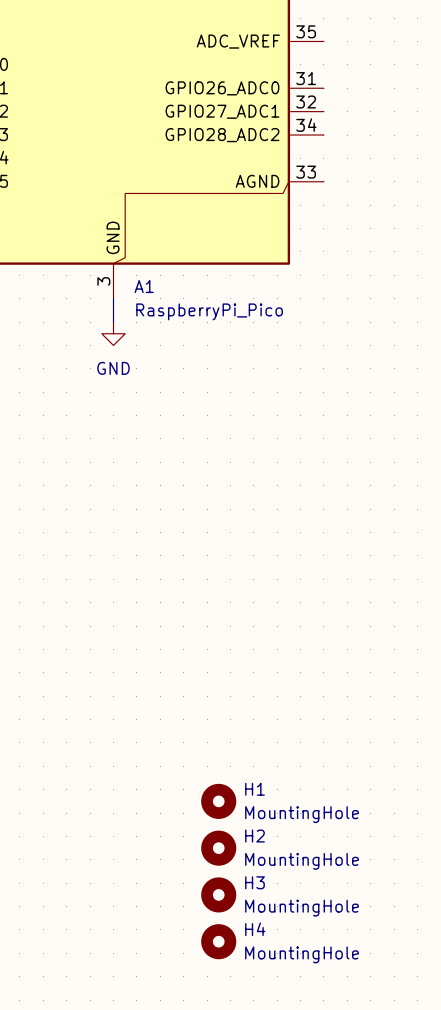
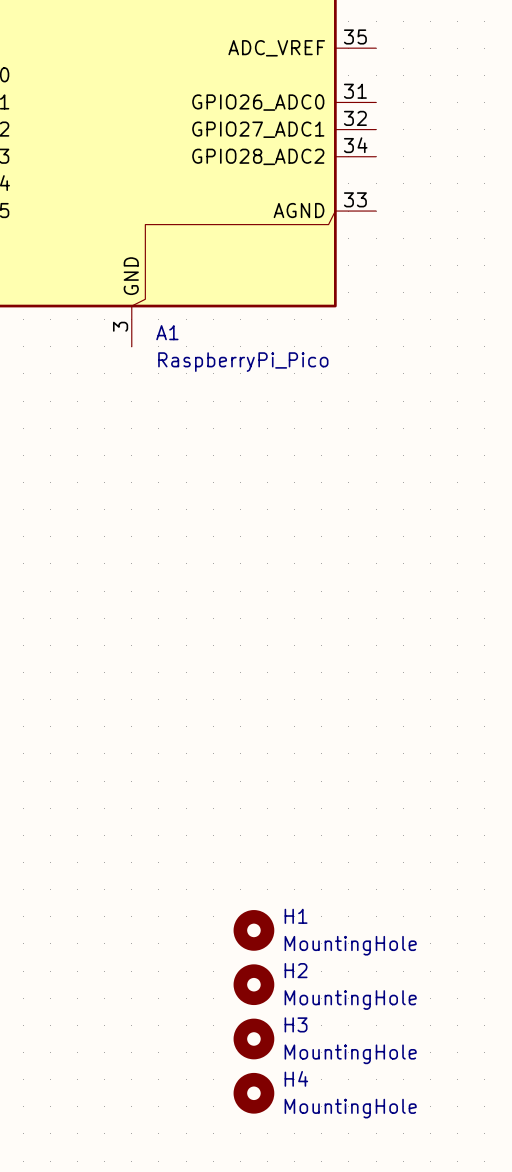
wire: (113, 298) (113, 322) -> none
power symbol: GND (113, 333) -> none

